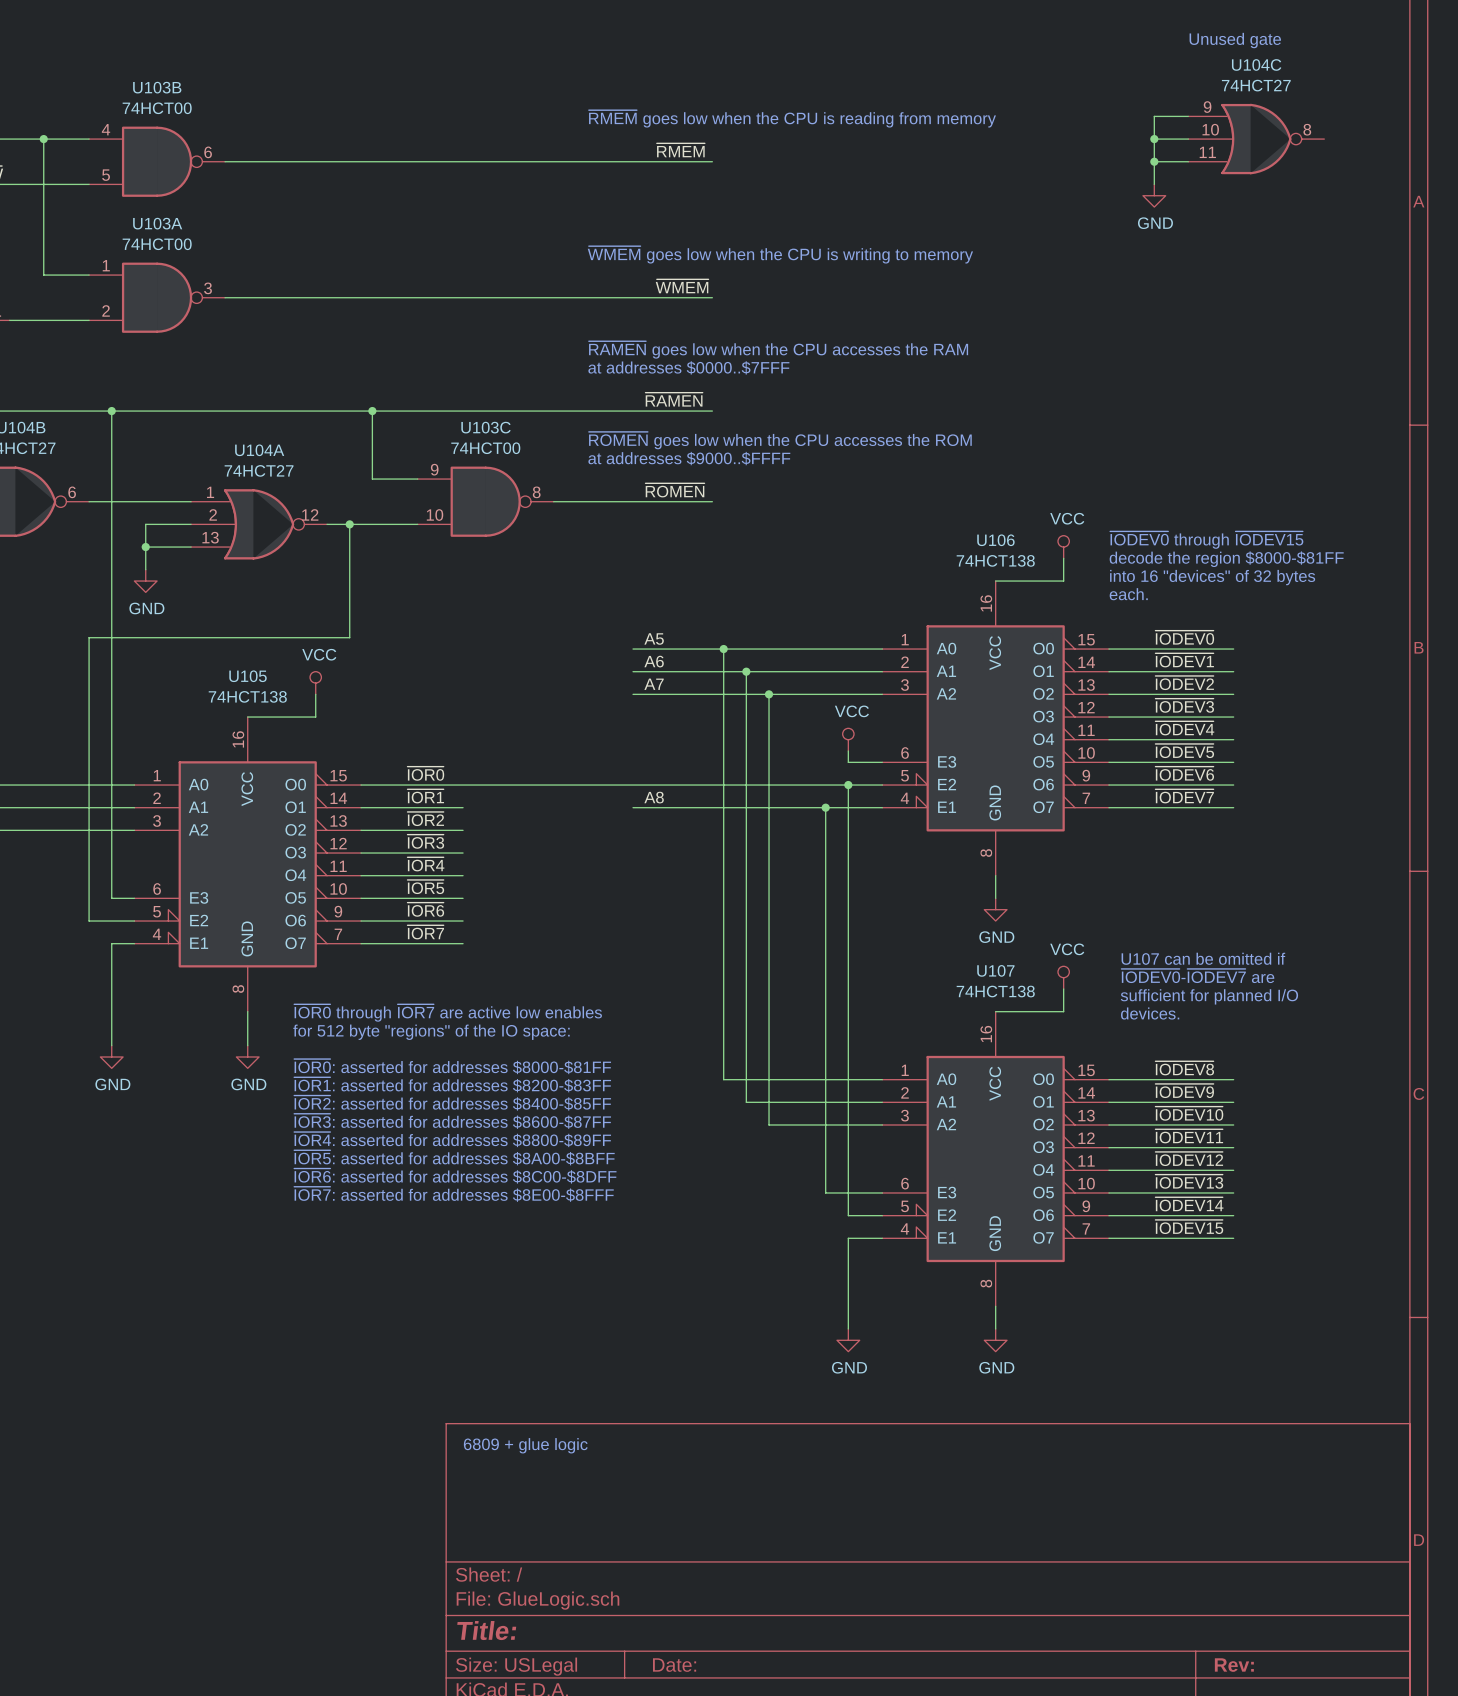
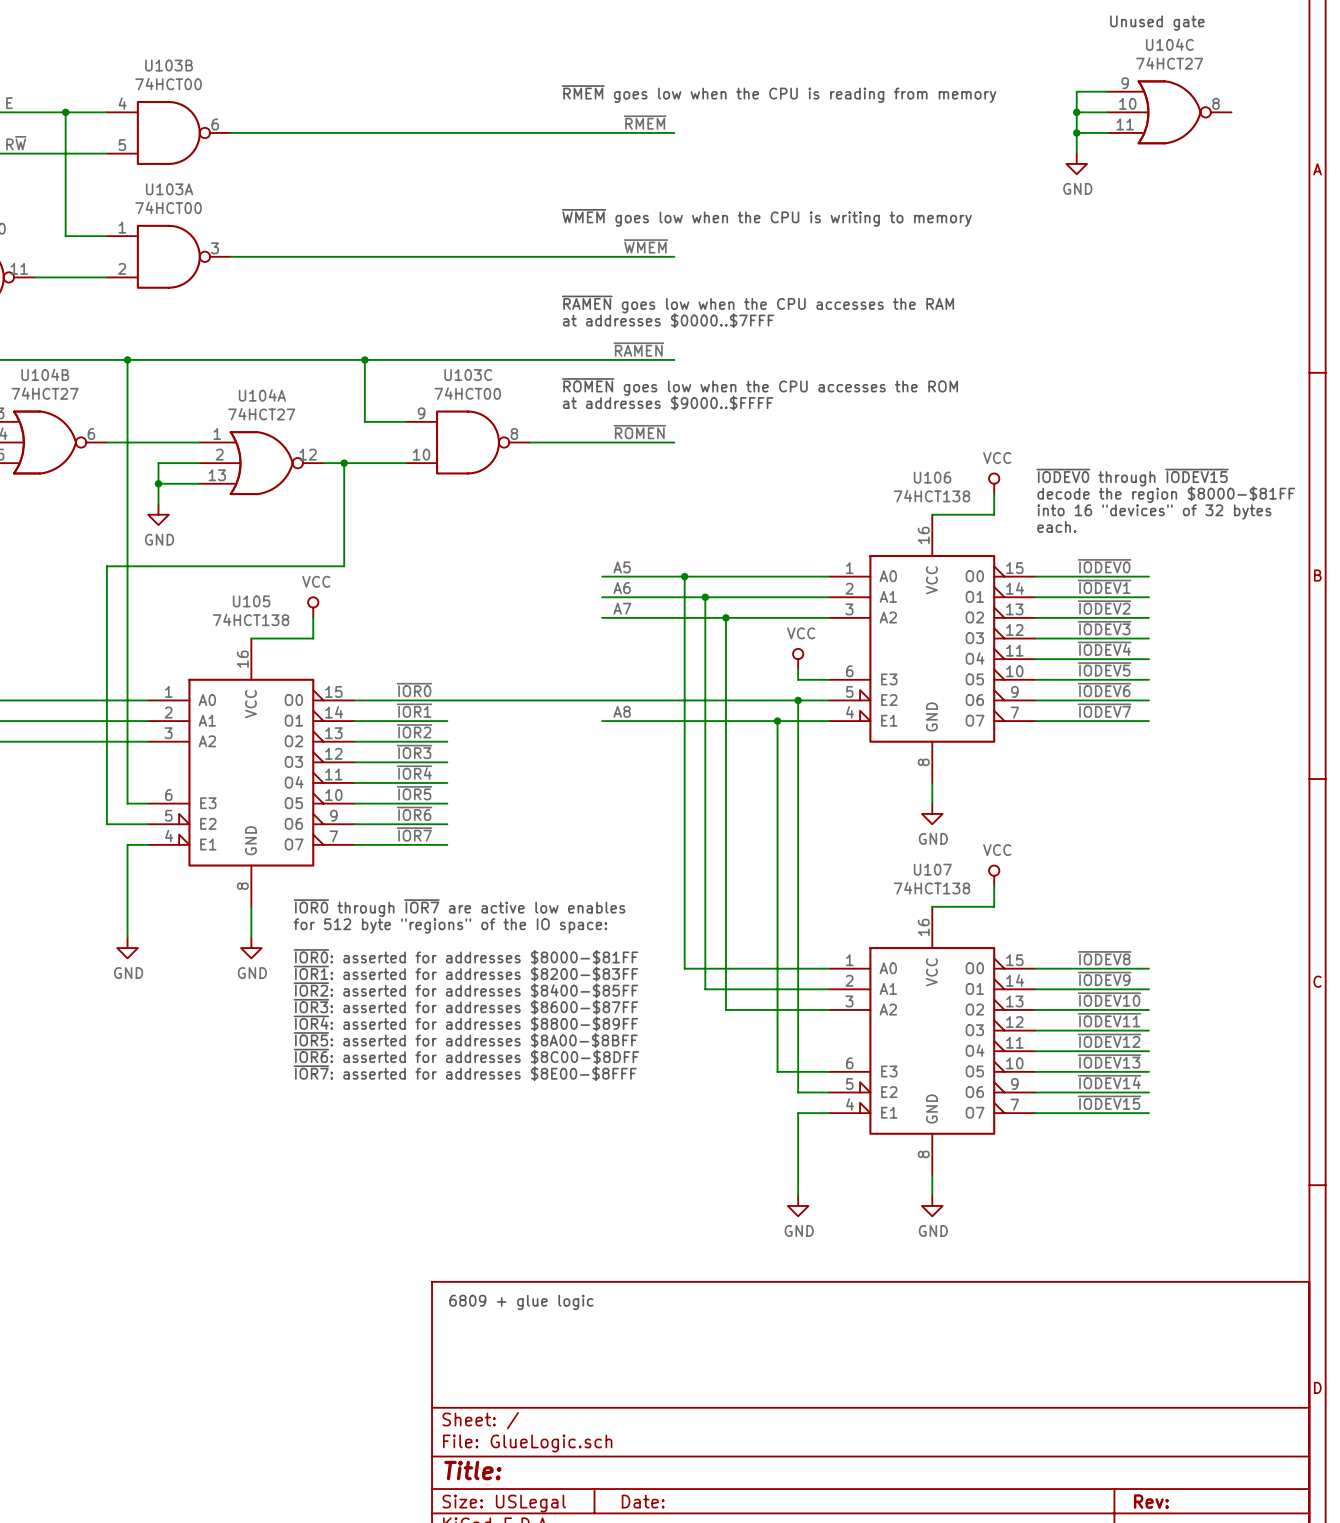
text: U107 can be omitted if (1203, 958) -> none
text: ~{IODEV0}-~{IODEV7} are (1197, 976) -> none
text: sufficient for planned I/O (1209, 996) -> none
text: devices. (1150, 1013) -> none

